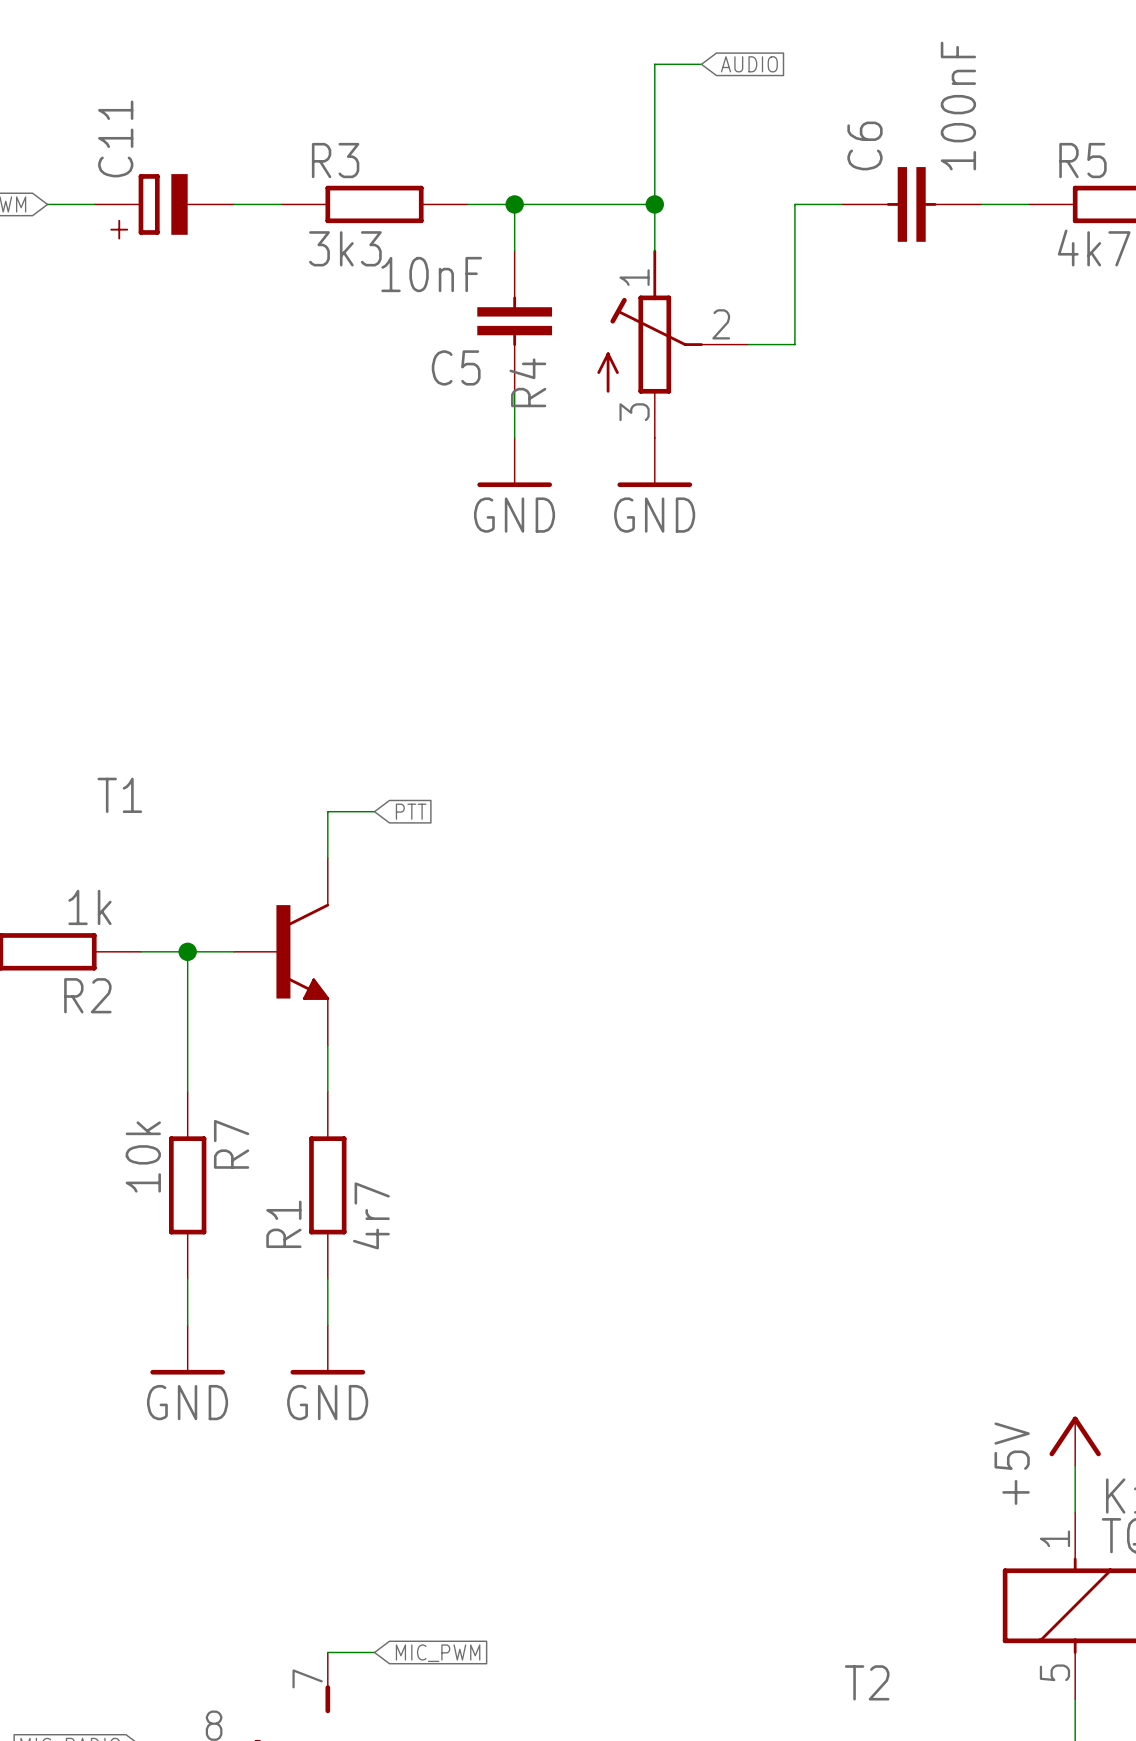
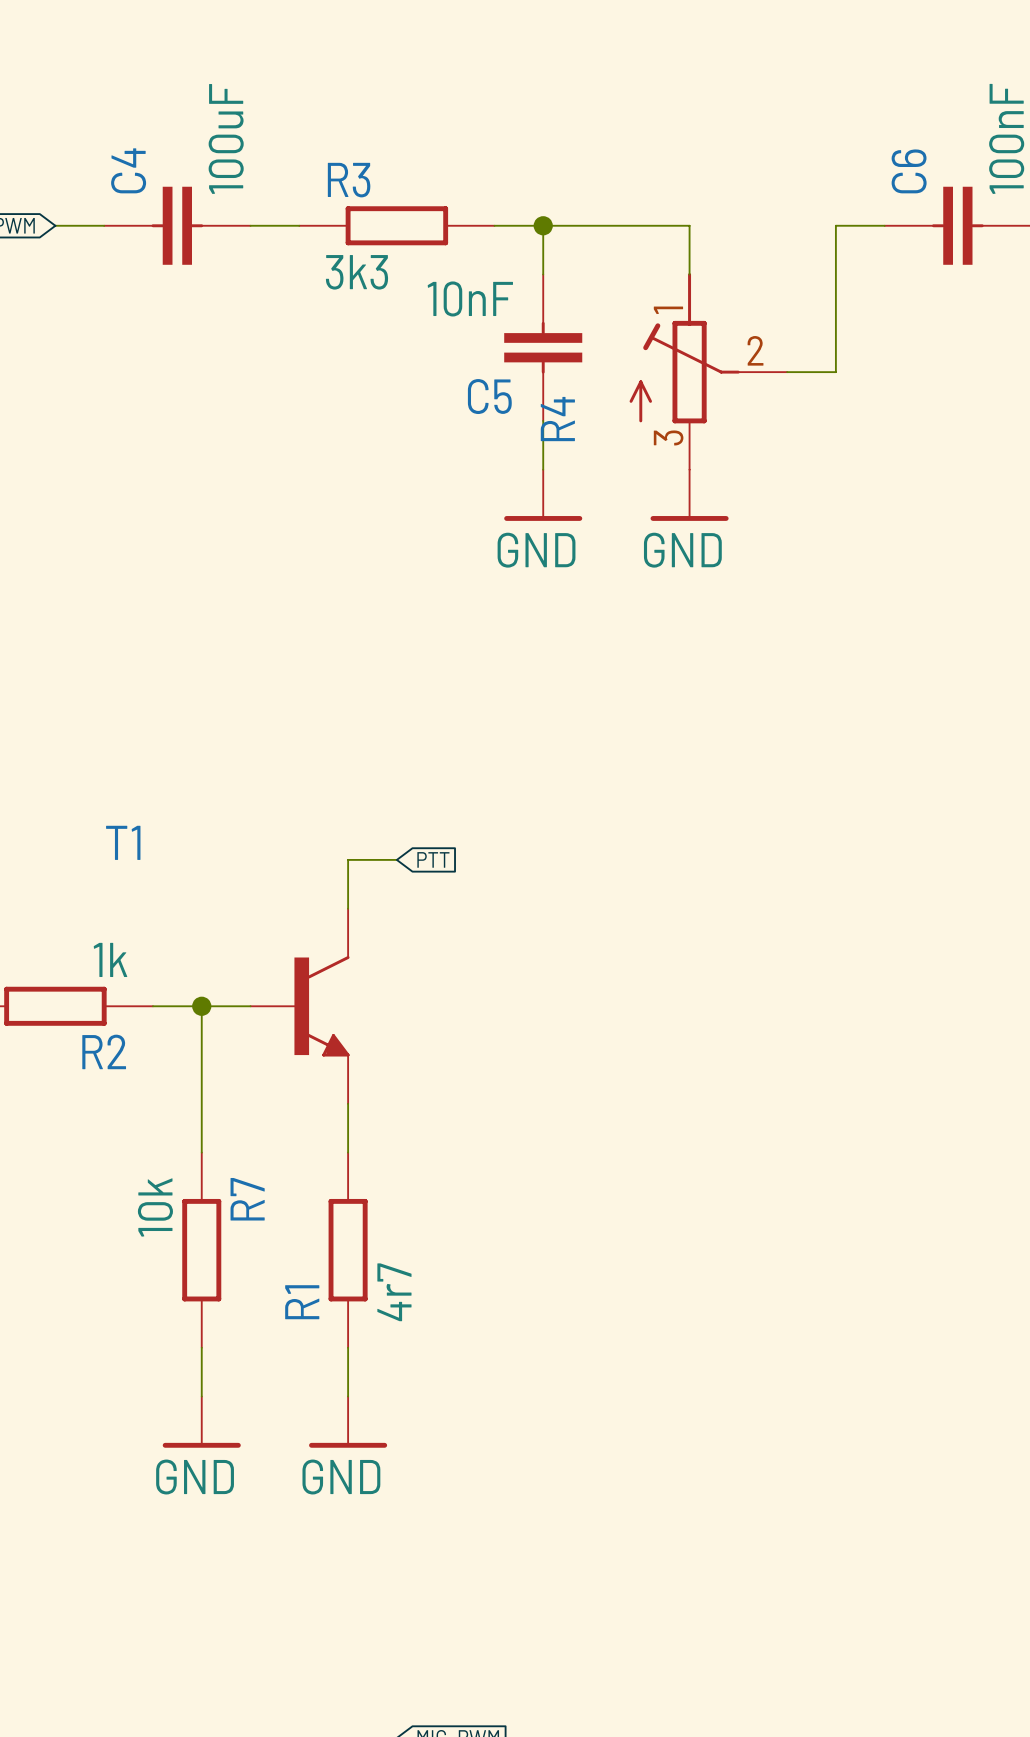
wire: (701, 64) (654, 64) (654, 204) -> none
global label: AUDIO (749, 64) -> none
C11: (164, 204) -> none
C4: none -> 100uF (177, 225)
junction: (654, 204) -> none

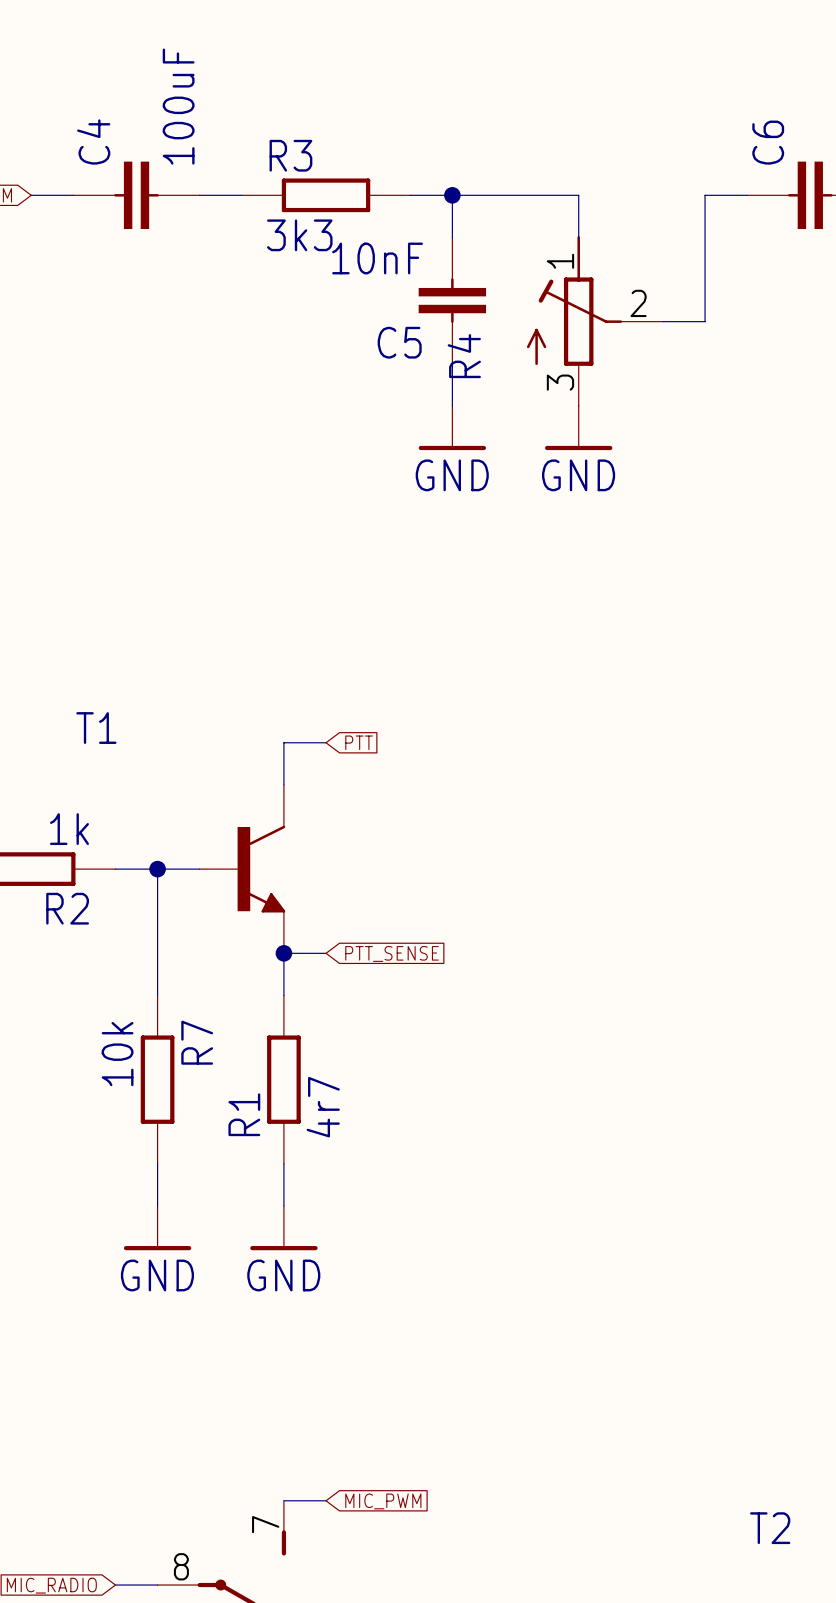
wire: none -> (283, 953) (326, 953)
junction: none -> (283, 953)
global label: none -> PTT_SENSE (392, 953)

